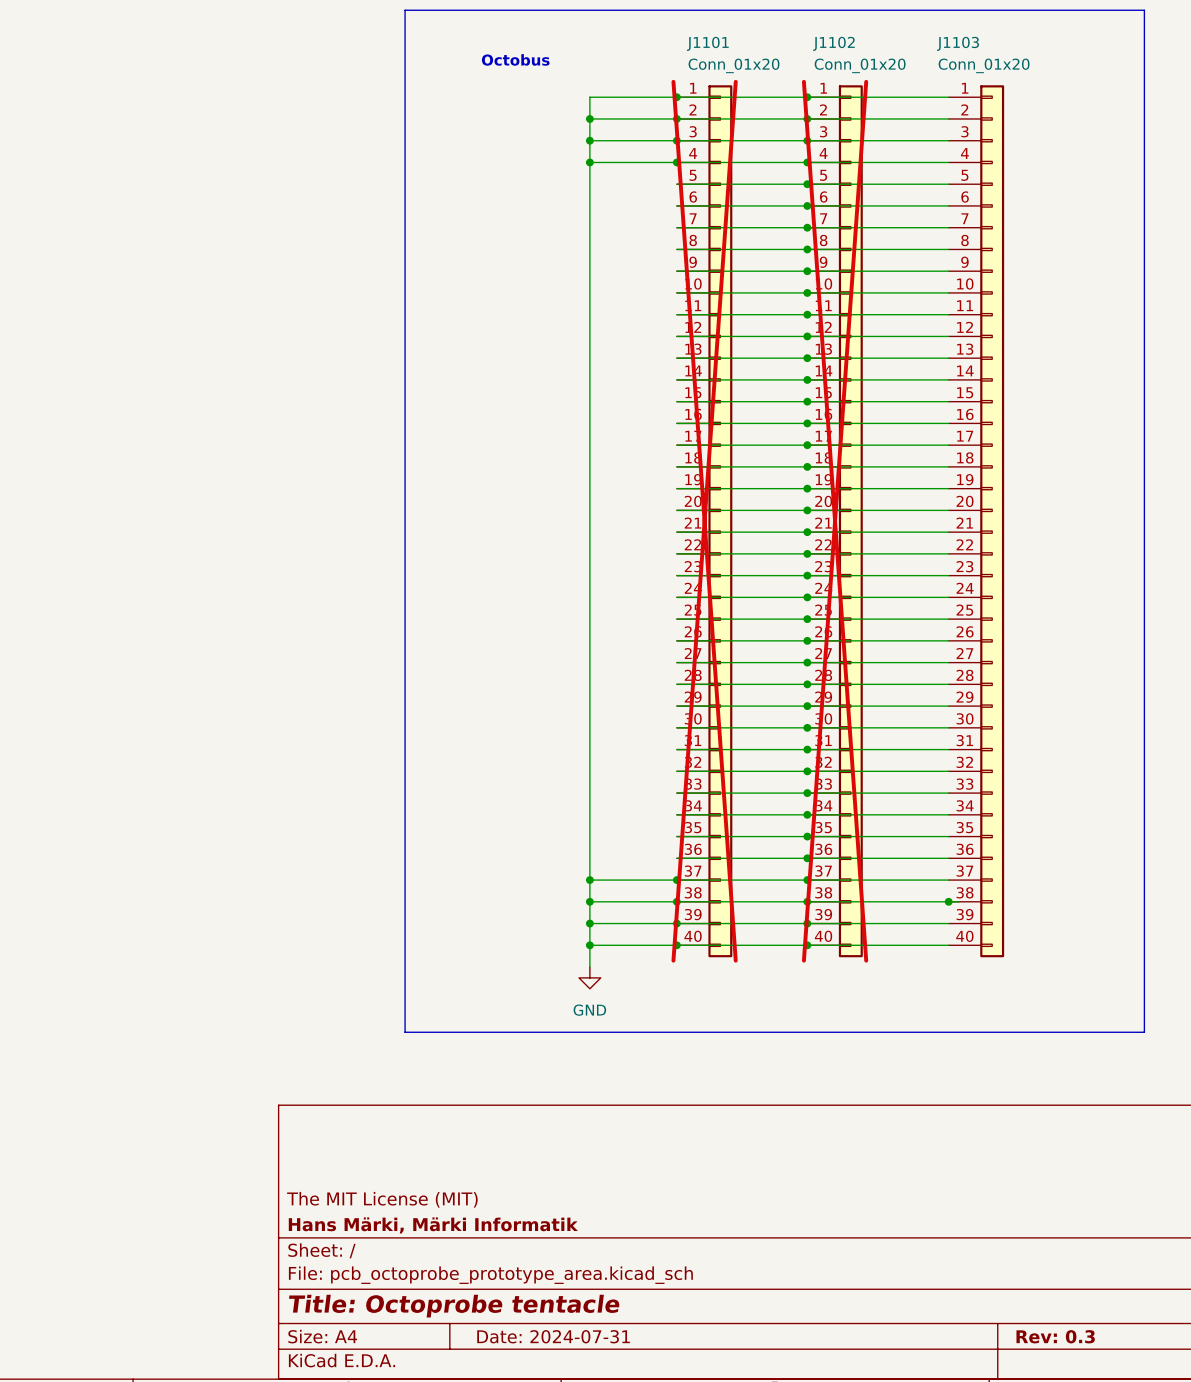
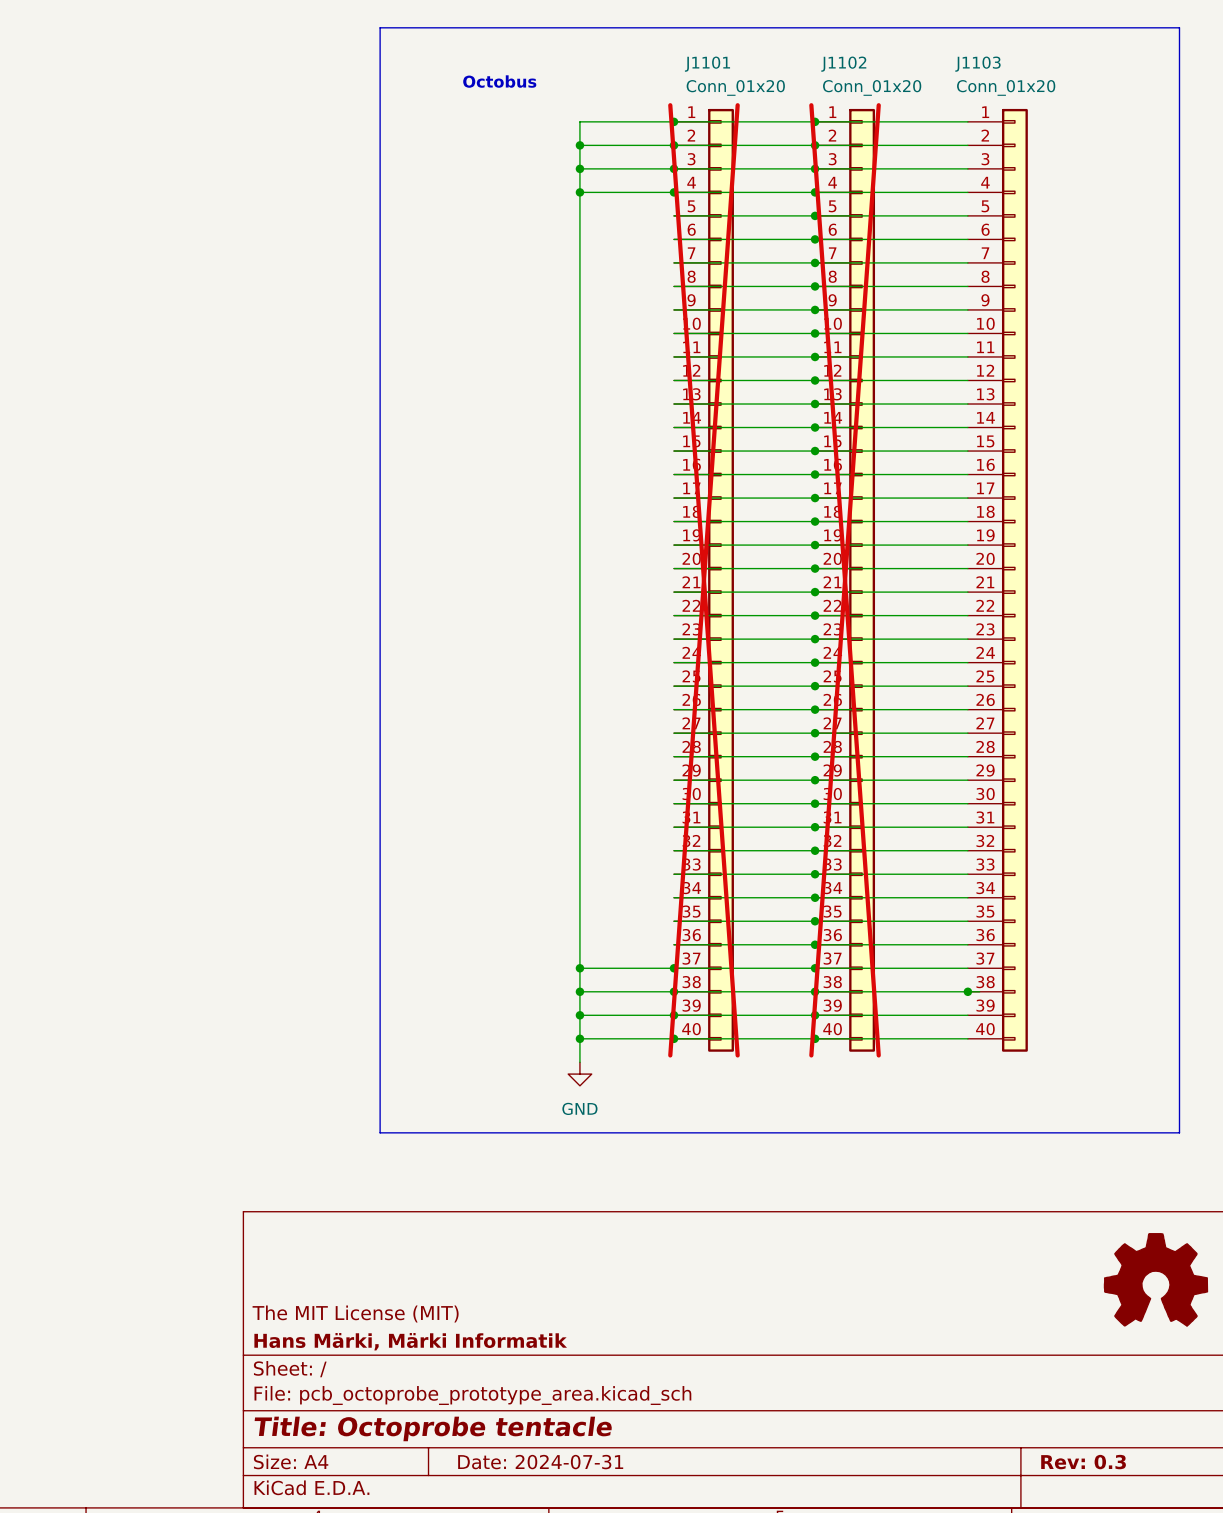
power symbol: none -> (1155, 1279)

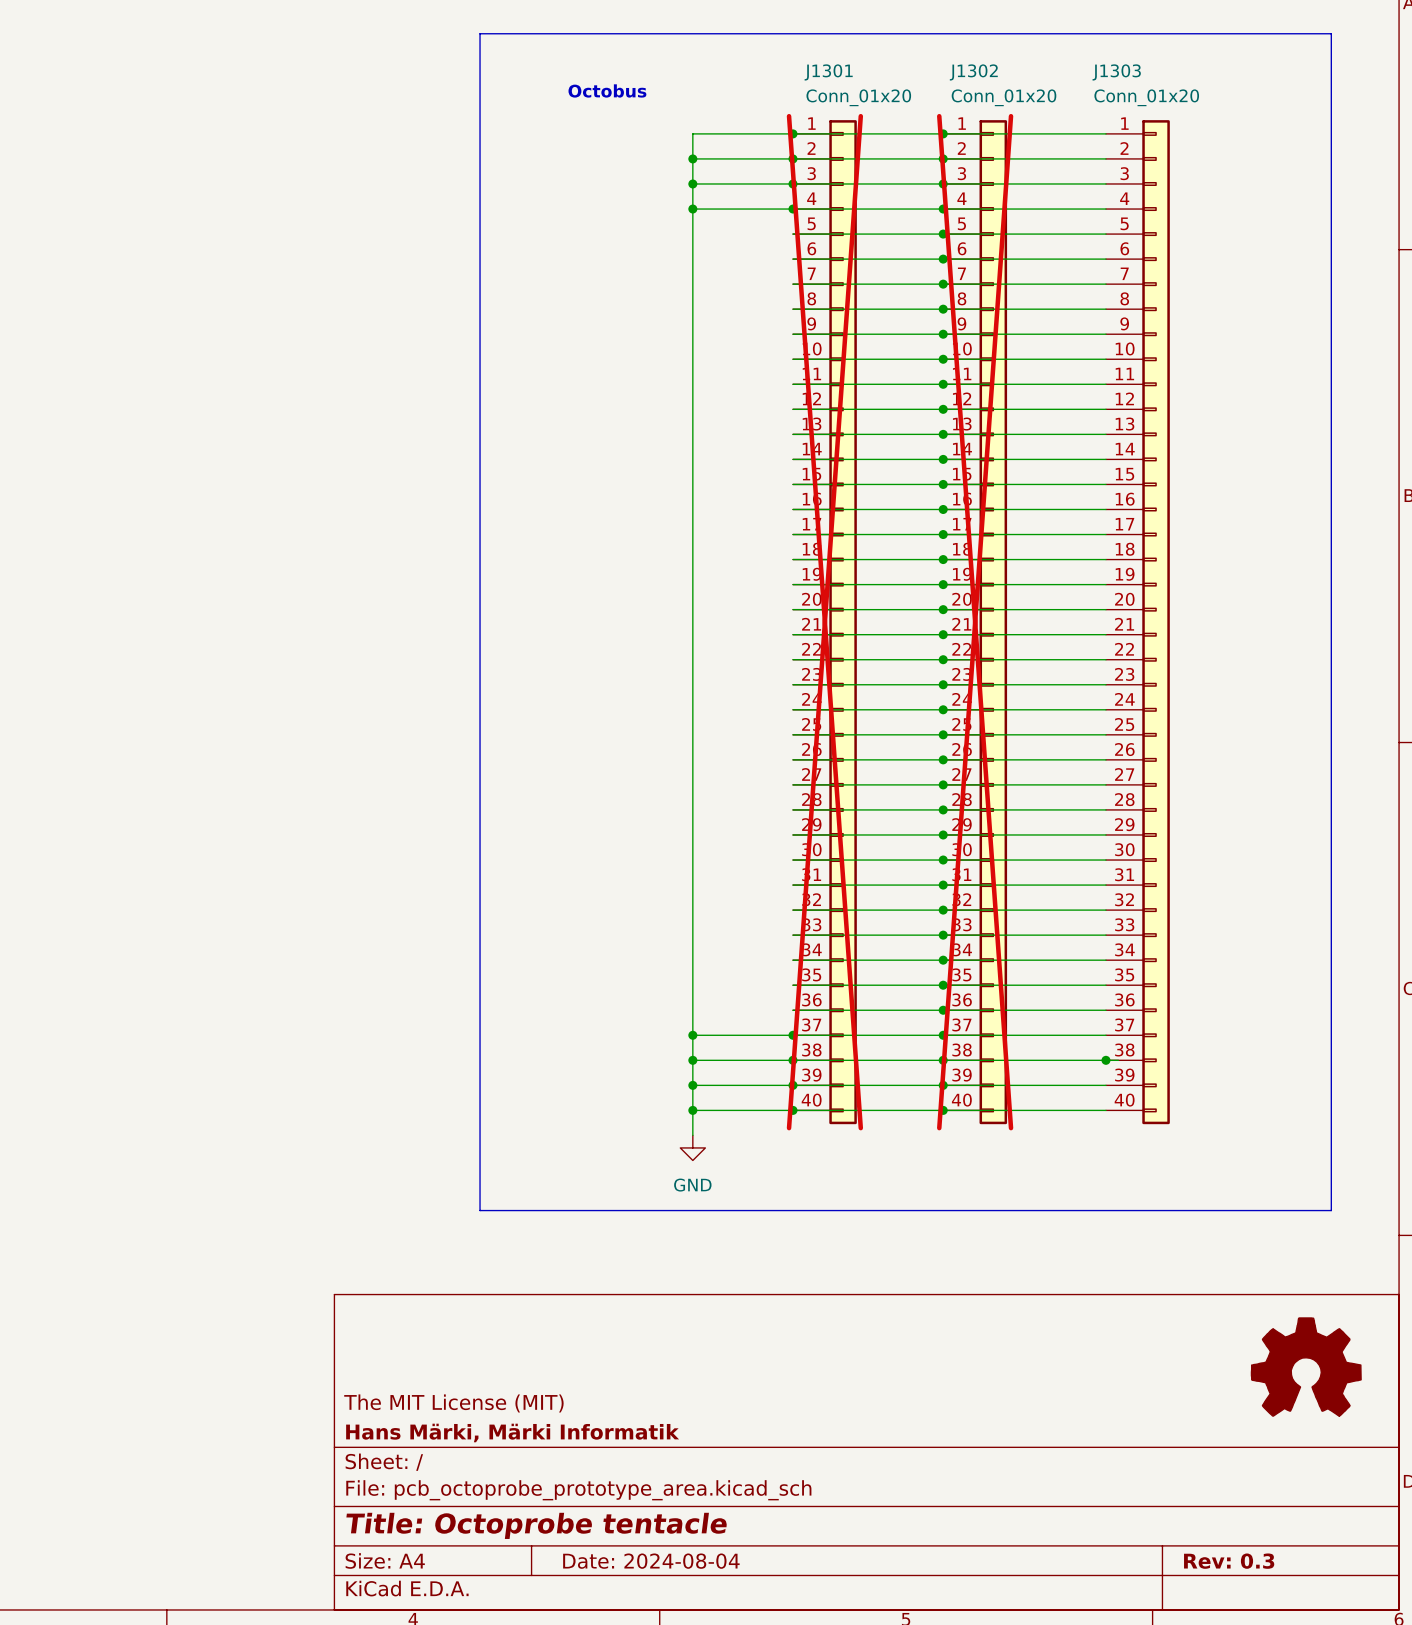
J1101 name: J1101 (707, 64) -> J1301 (828, 72)
J1102 name: J1102 (843, 64) -> J1302 (973, 72)
J1103 name: J1103 (977, 64) -> J1303 (1116, 72)
title block: Date: 2024-07-31 (540, 1462) -> Date: 2024-08-04 (651, 1561)

